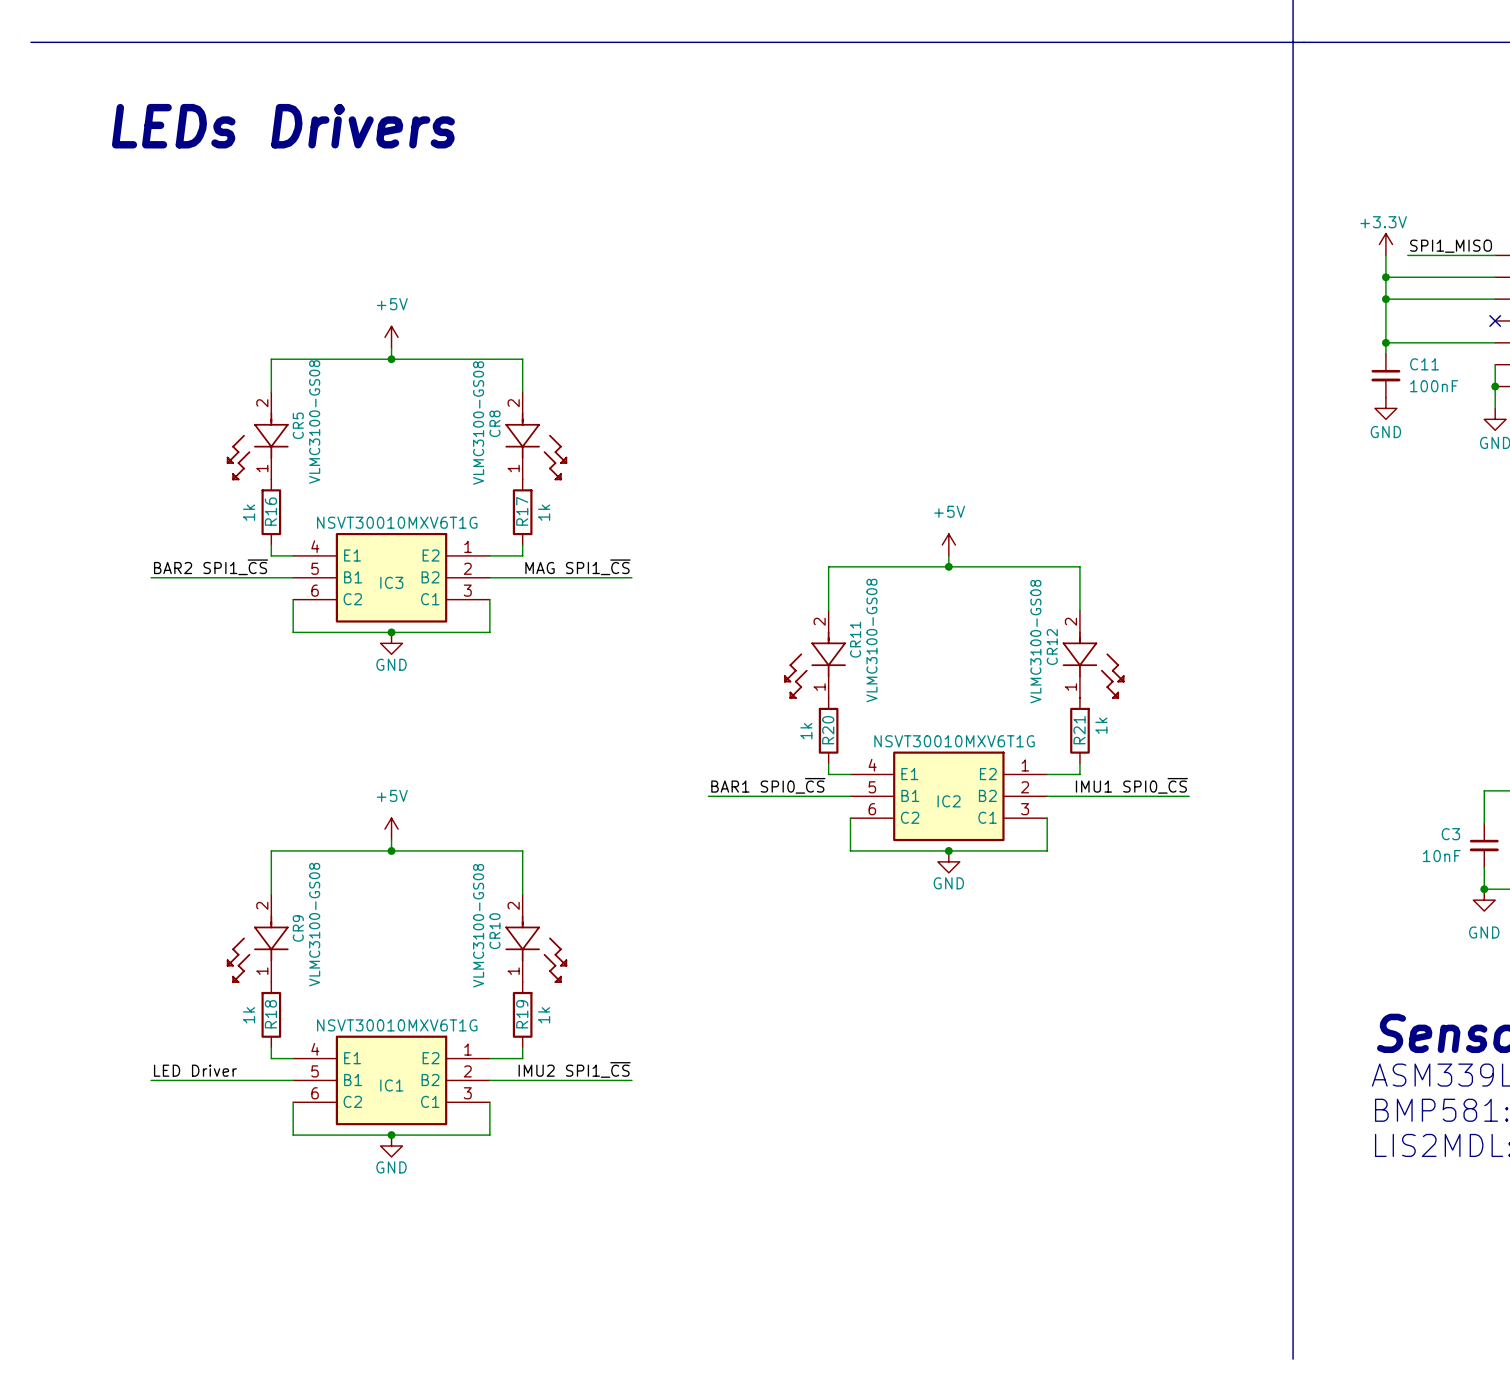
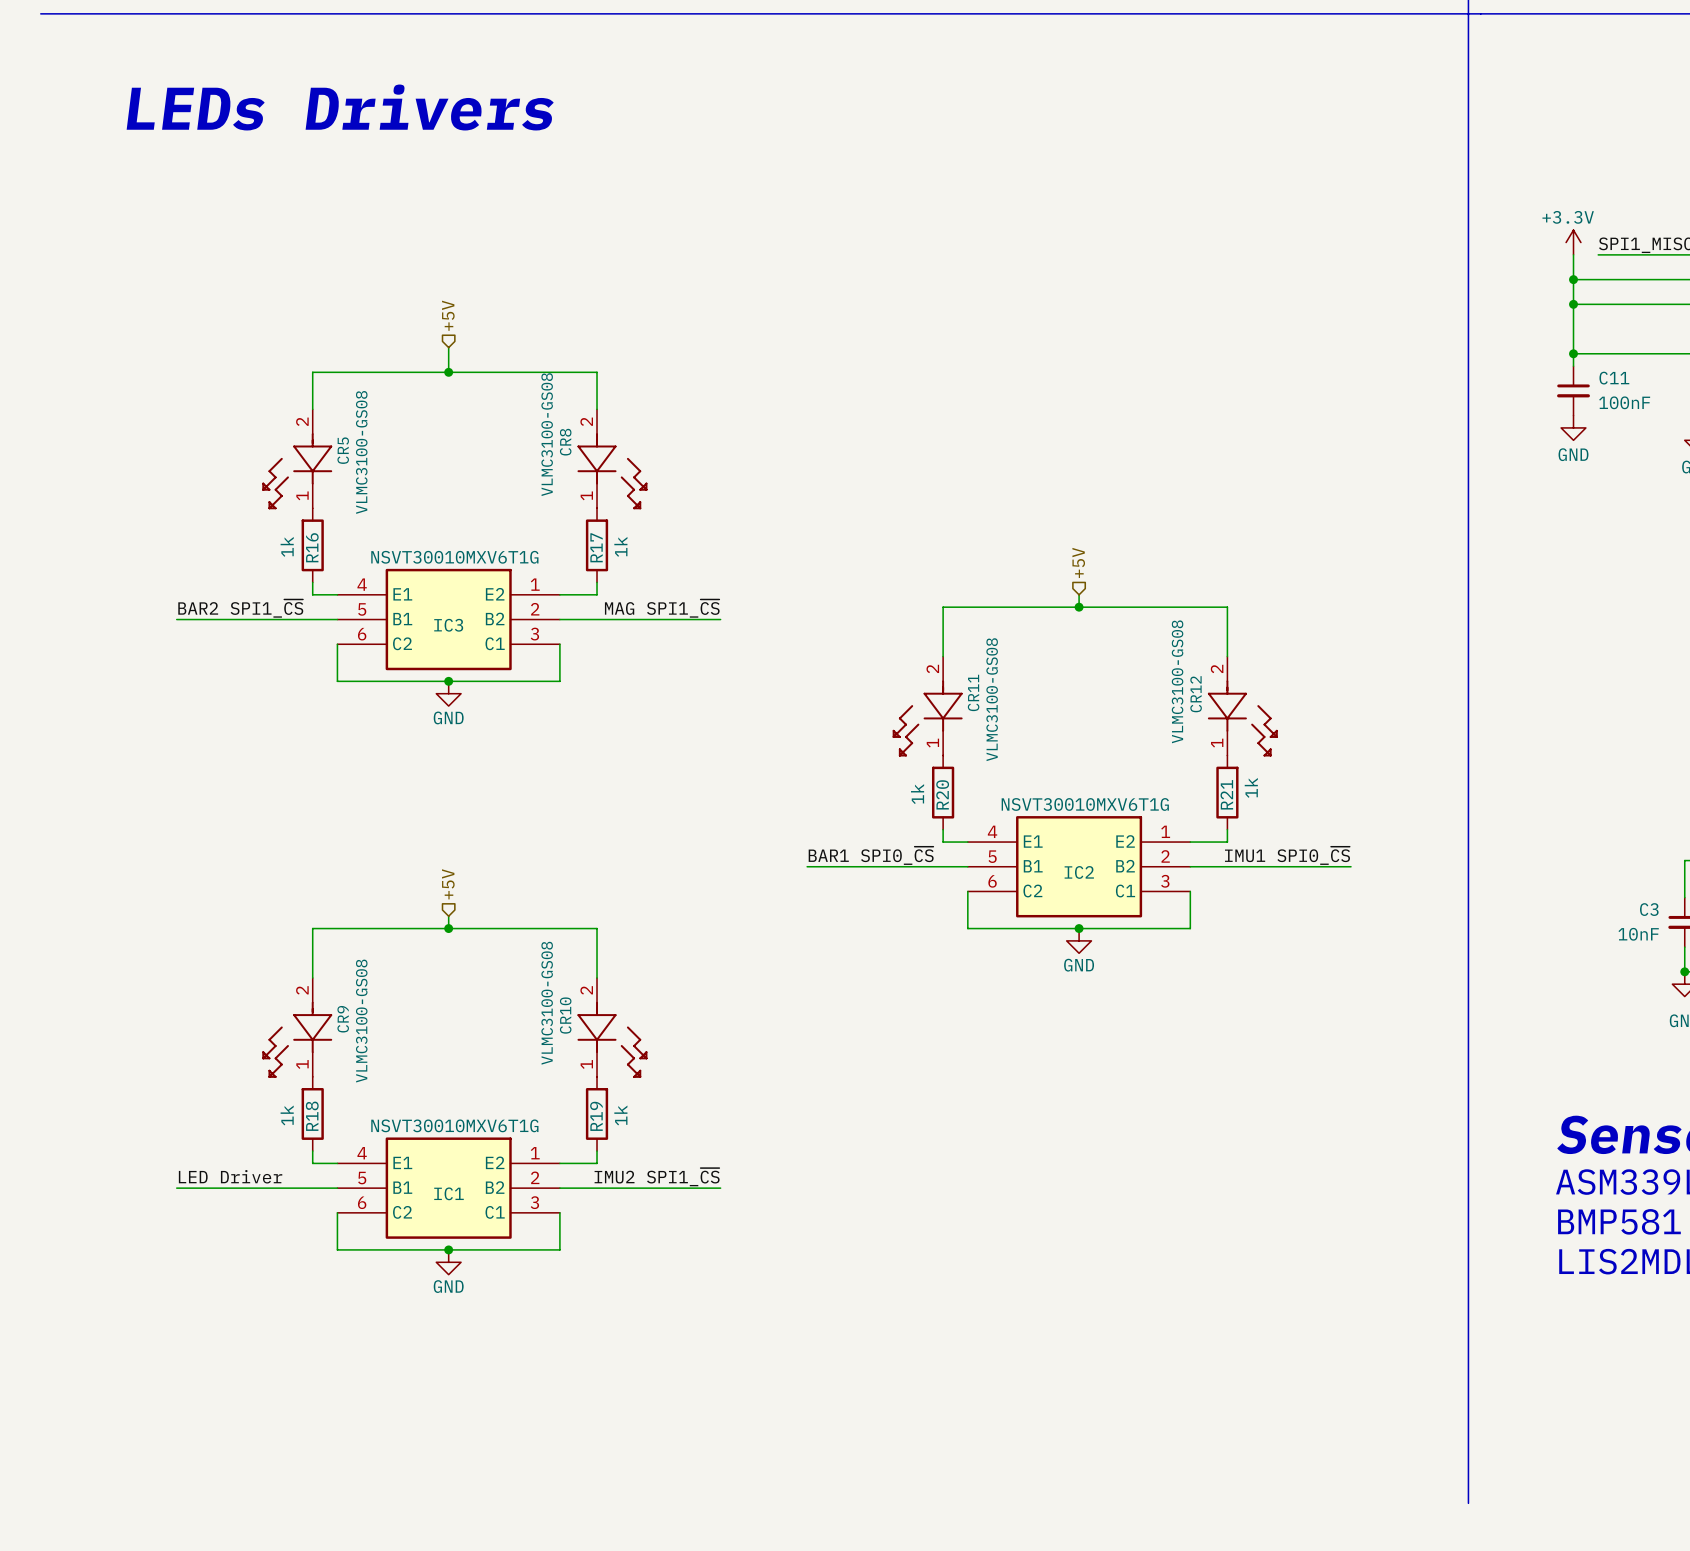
hierarchical label: none -> +5V (448, 315)
power symbol: +5V (391, 337) -> none
hierarchical label: none -> +5V (1078, 562)
power symbol: +5V (948, 544) -> none
hierarchical label: none -> +5V (448, 884)
power symbol: +5V (391, 829) -> none

